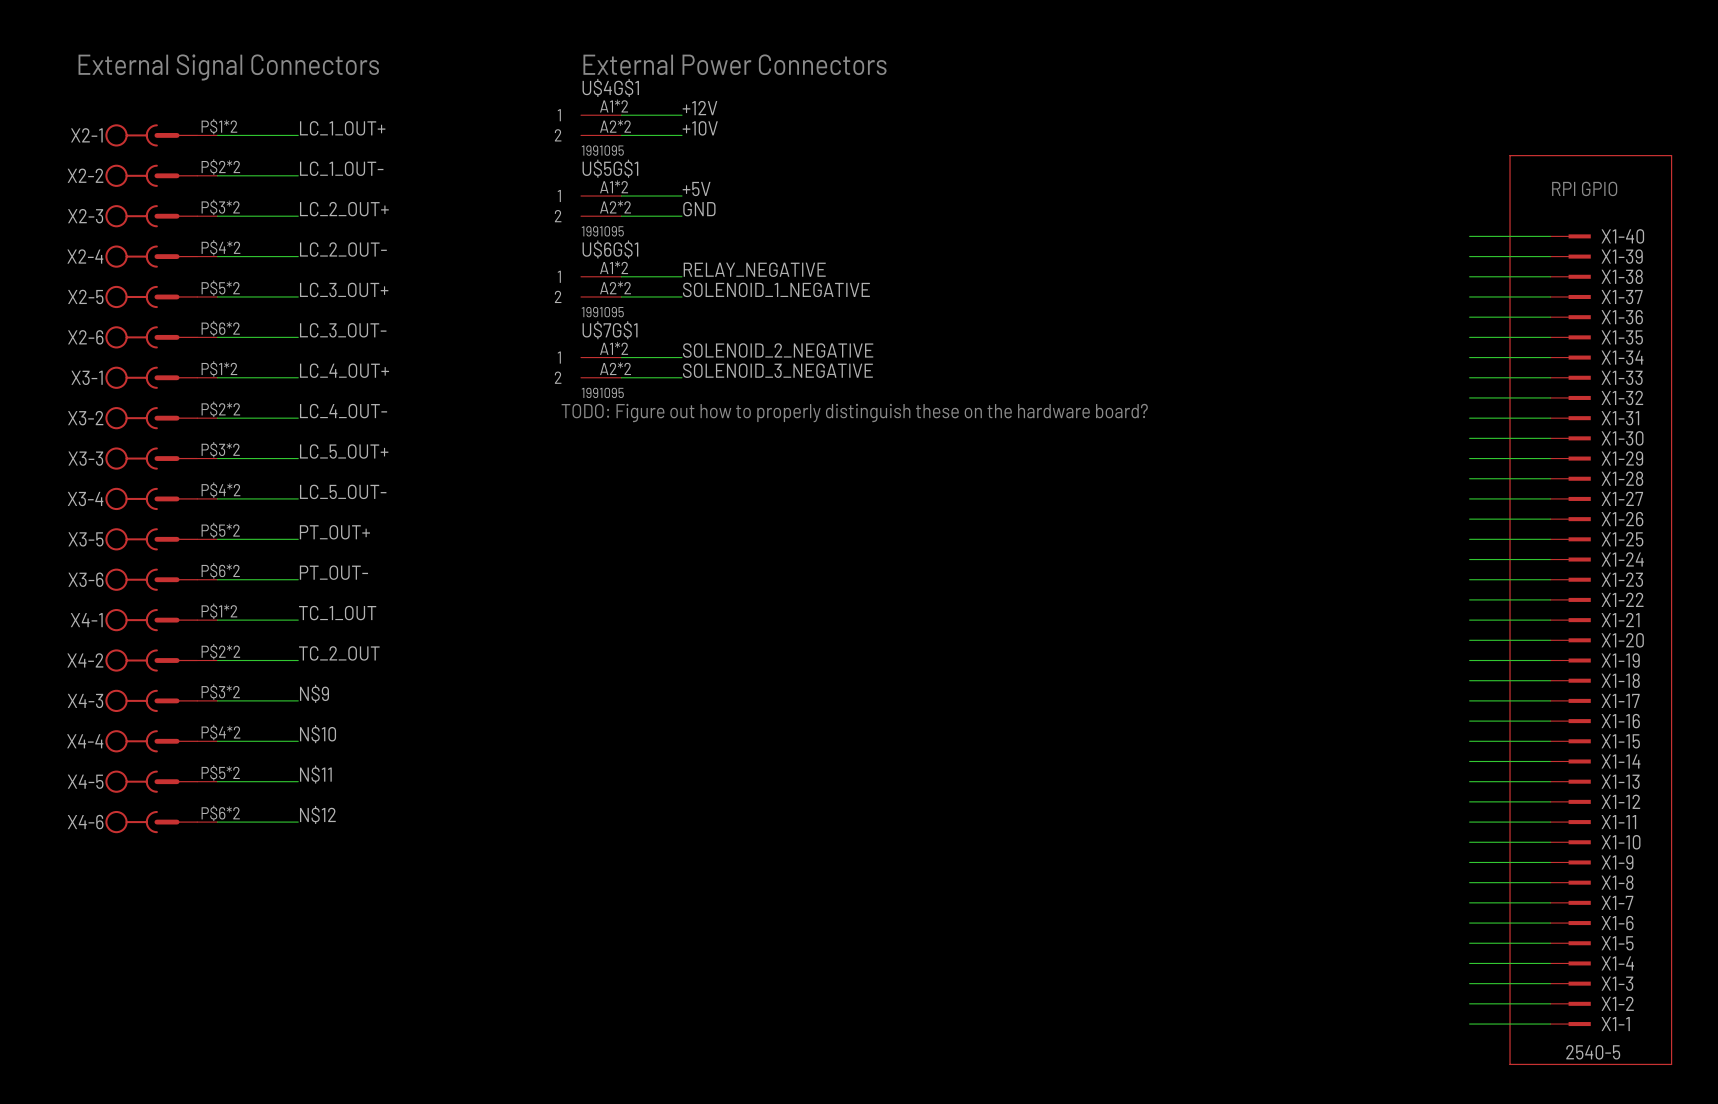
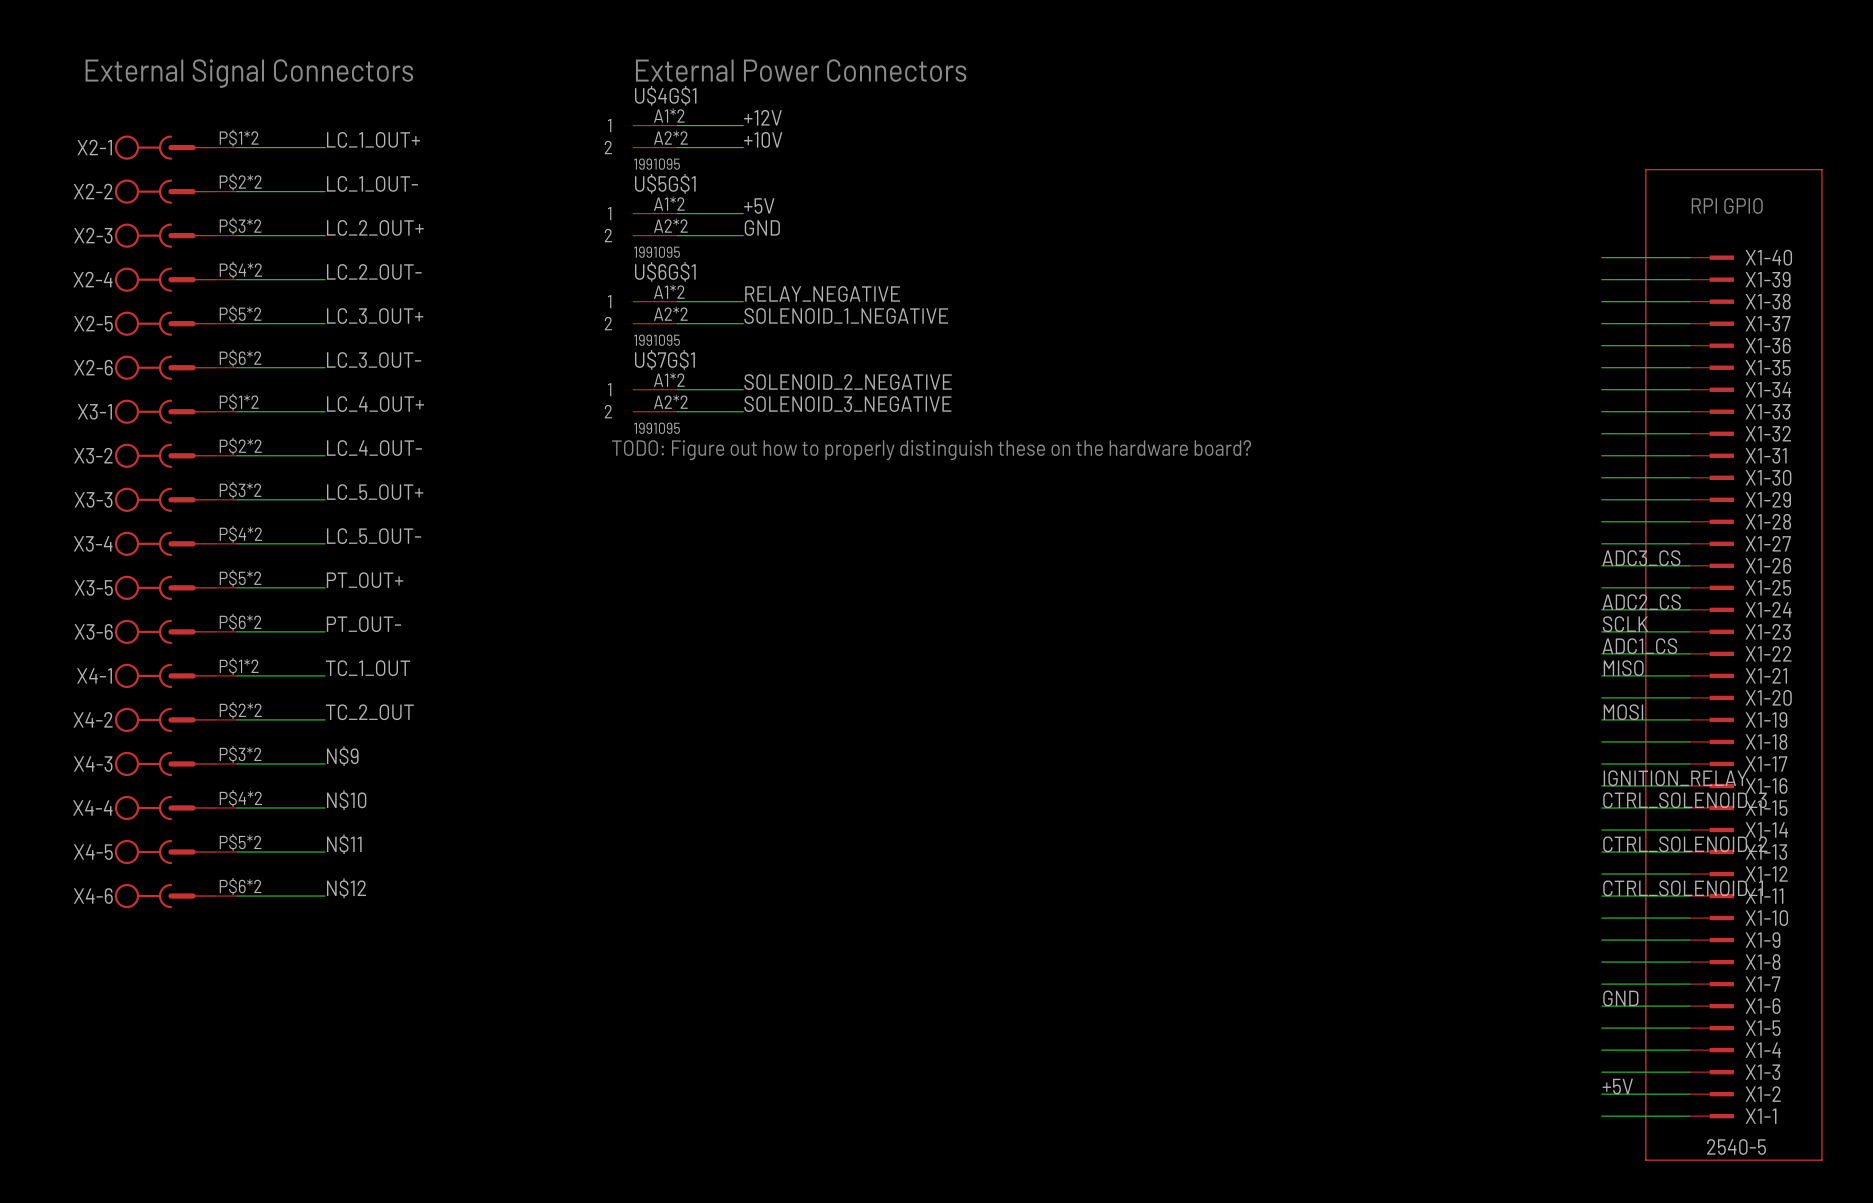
label: none -> ADC3_CS (1641, 558)
label: none -> ADC2_CS (1641, 602)
label: none -> SCLK (1625, 624)
label: none -> ADC1_CS (1639, 646)
label: none -> MISO (1623, 668)
label: none -> MOSI (1623, 712)
label: none -> IGNITION_RELAY (1675, 778)
label: none -> CTRL_SOLENOID_3 (1685, 800)
label: none -> CTRL_SOLENOID_2 (1685, 844)
label: none -> CTRL_SOLENOID_1 (1683, 888)
label: none -> GND (1620, 998)
label: none -> +5V (1617, 1086)

